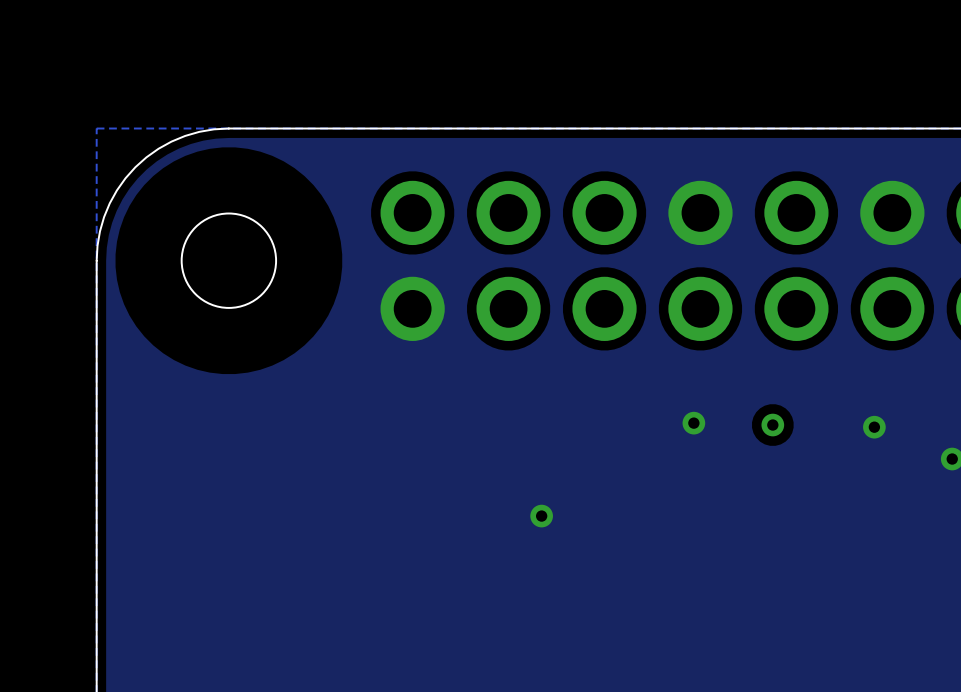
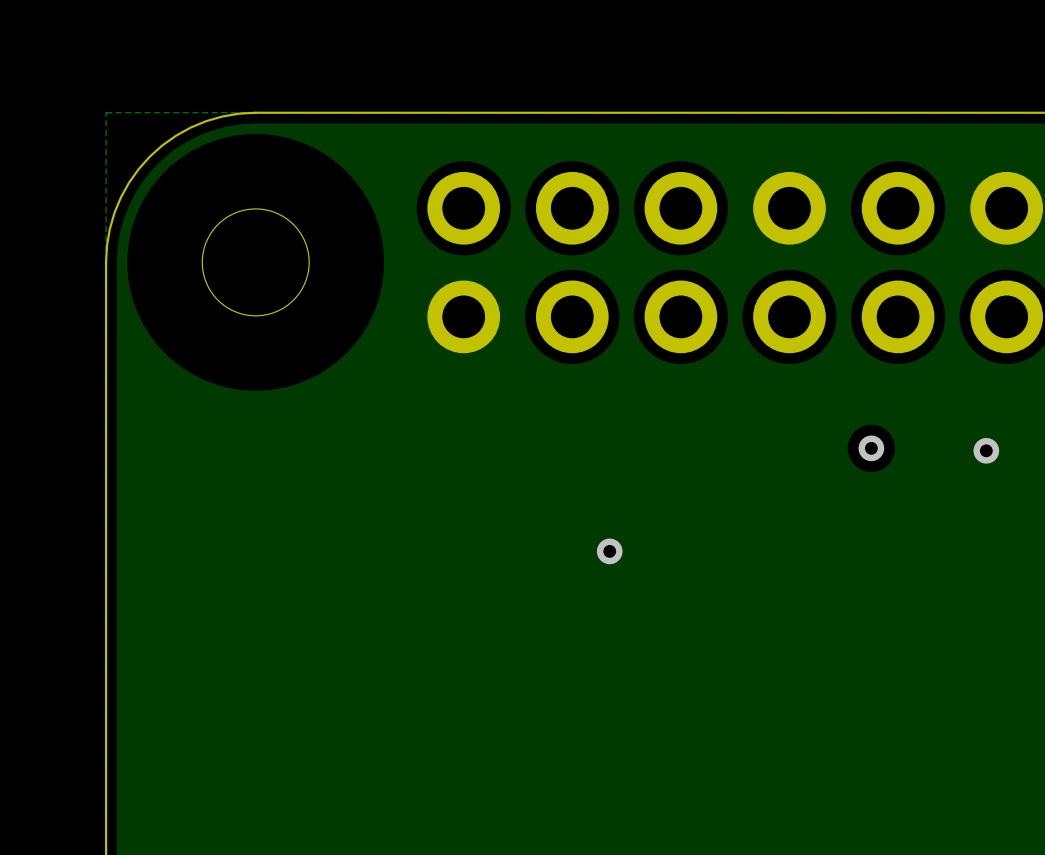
via: (693, 423) -> none

